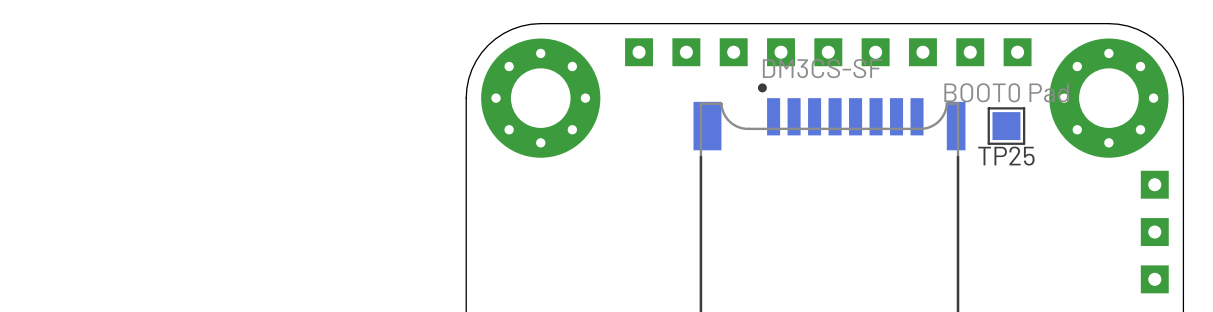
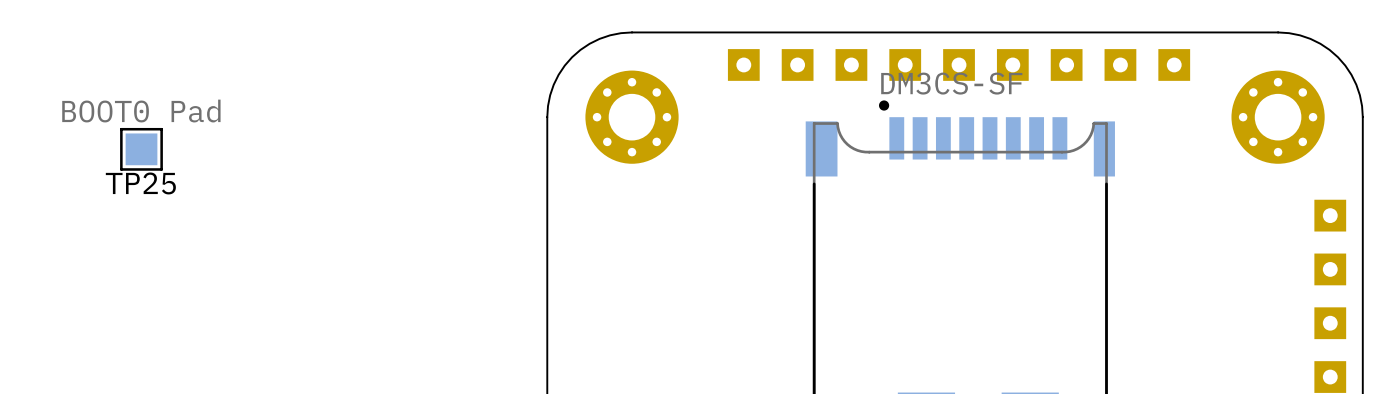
part footprint: [481, 38, 601, 158] -> [585, 70, 679, 164]
part footprint: [1049, 38, 1169, 158] -> [1231, 70, 1325, 164]
TP25 position: (1006, 126) -> (141, 149)

